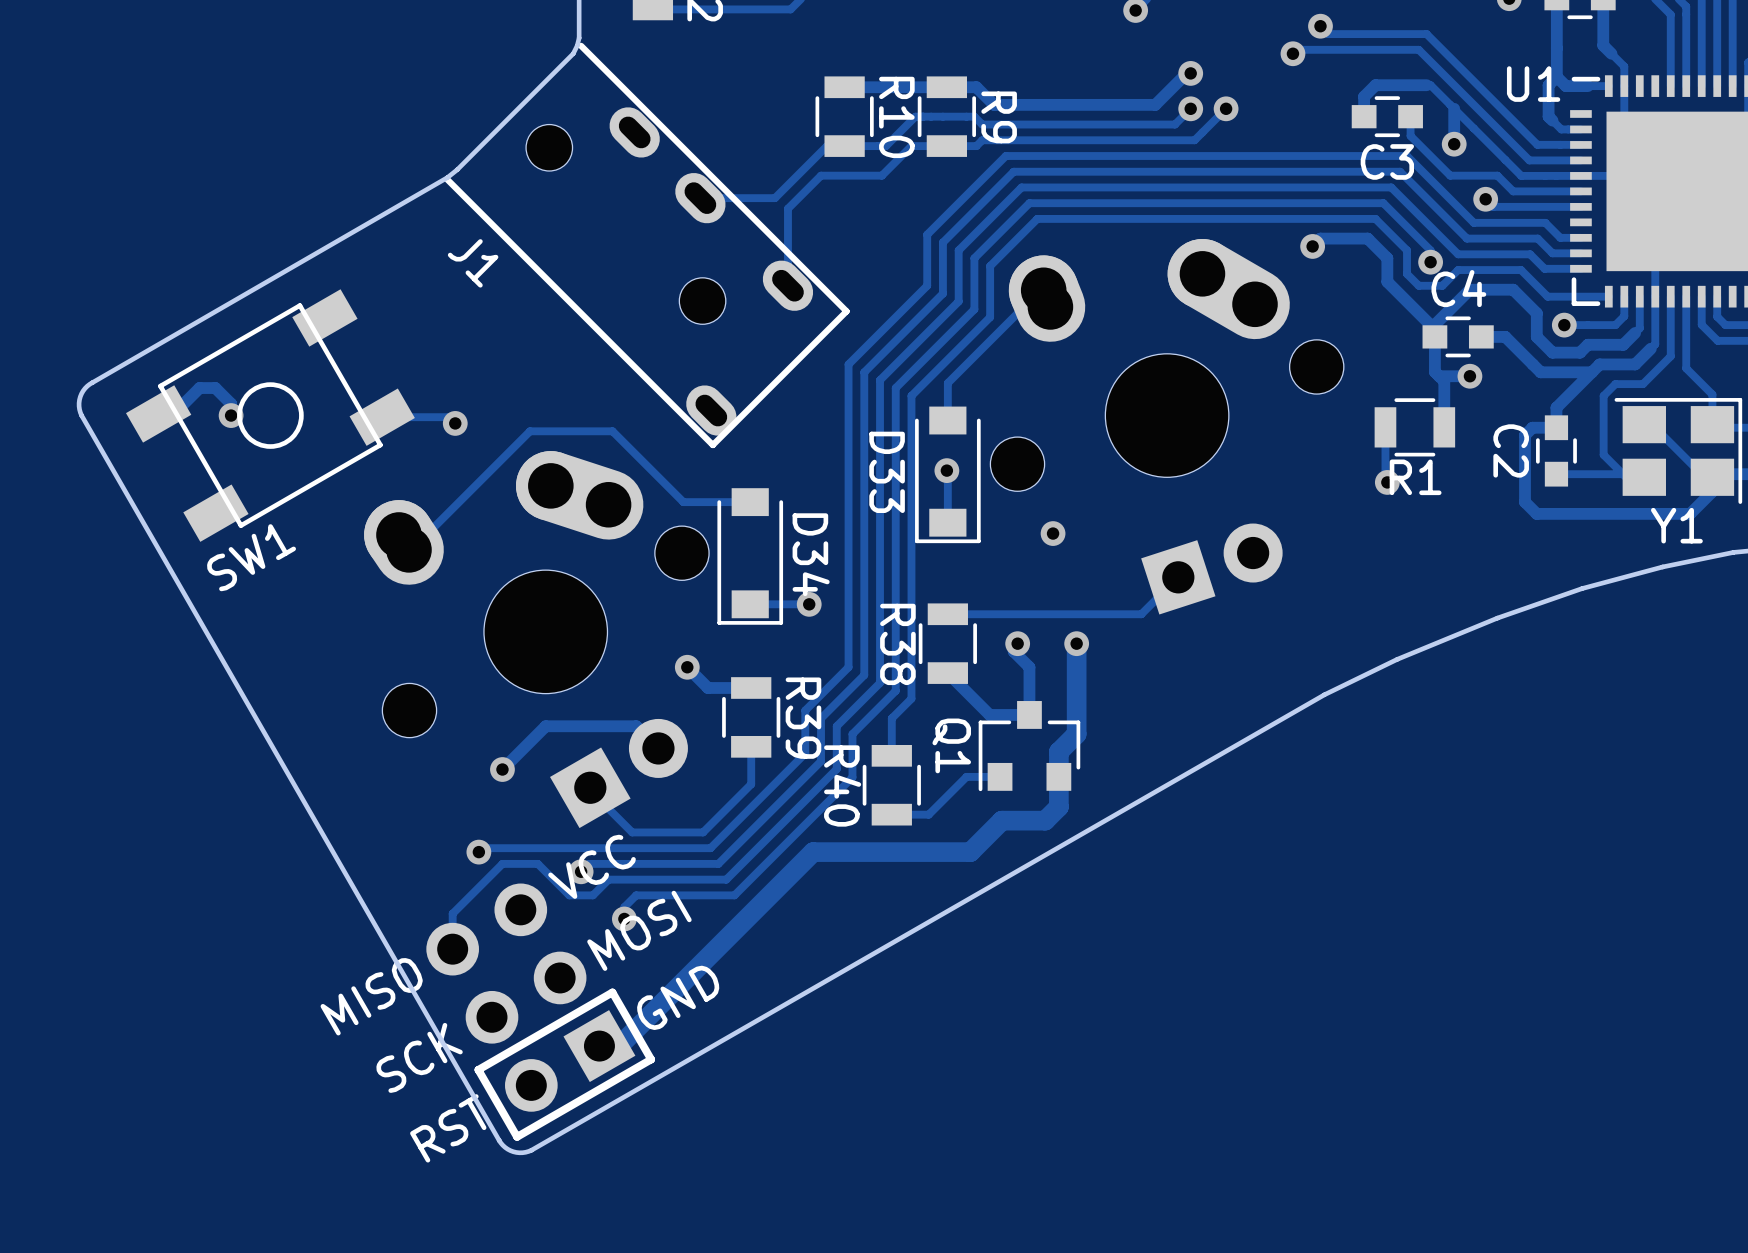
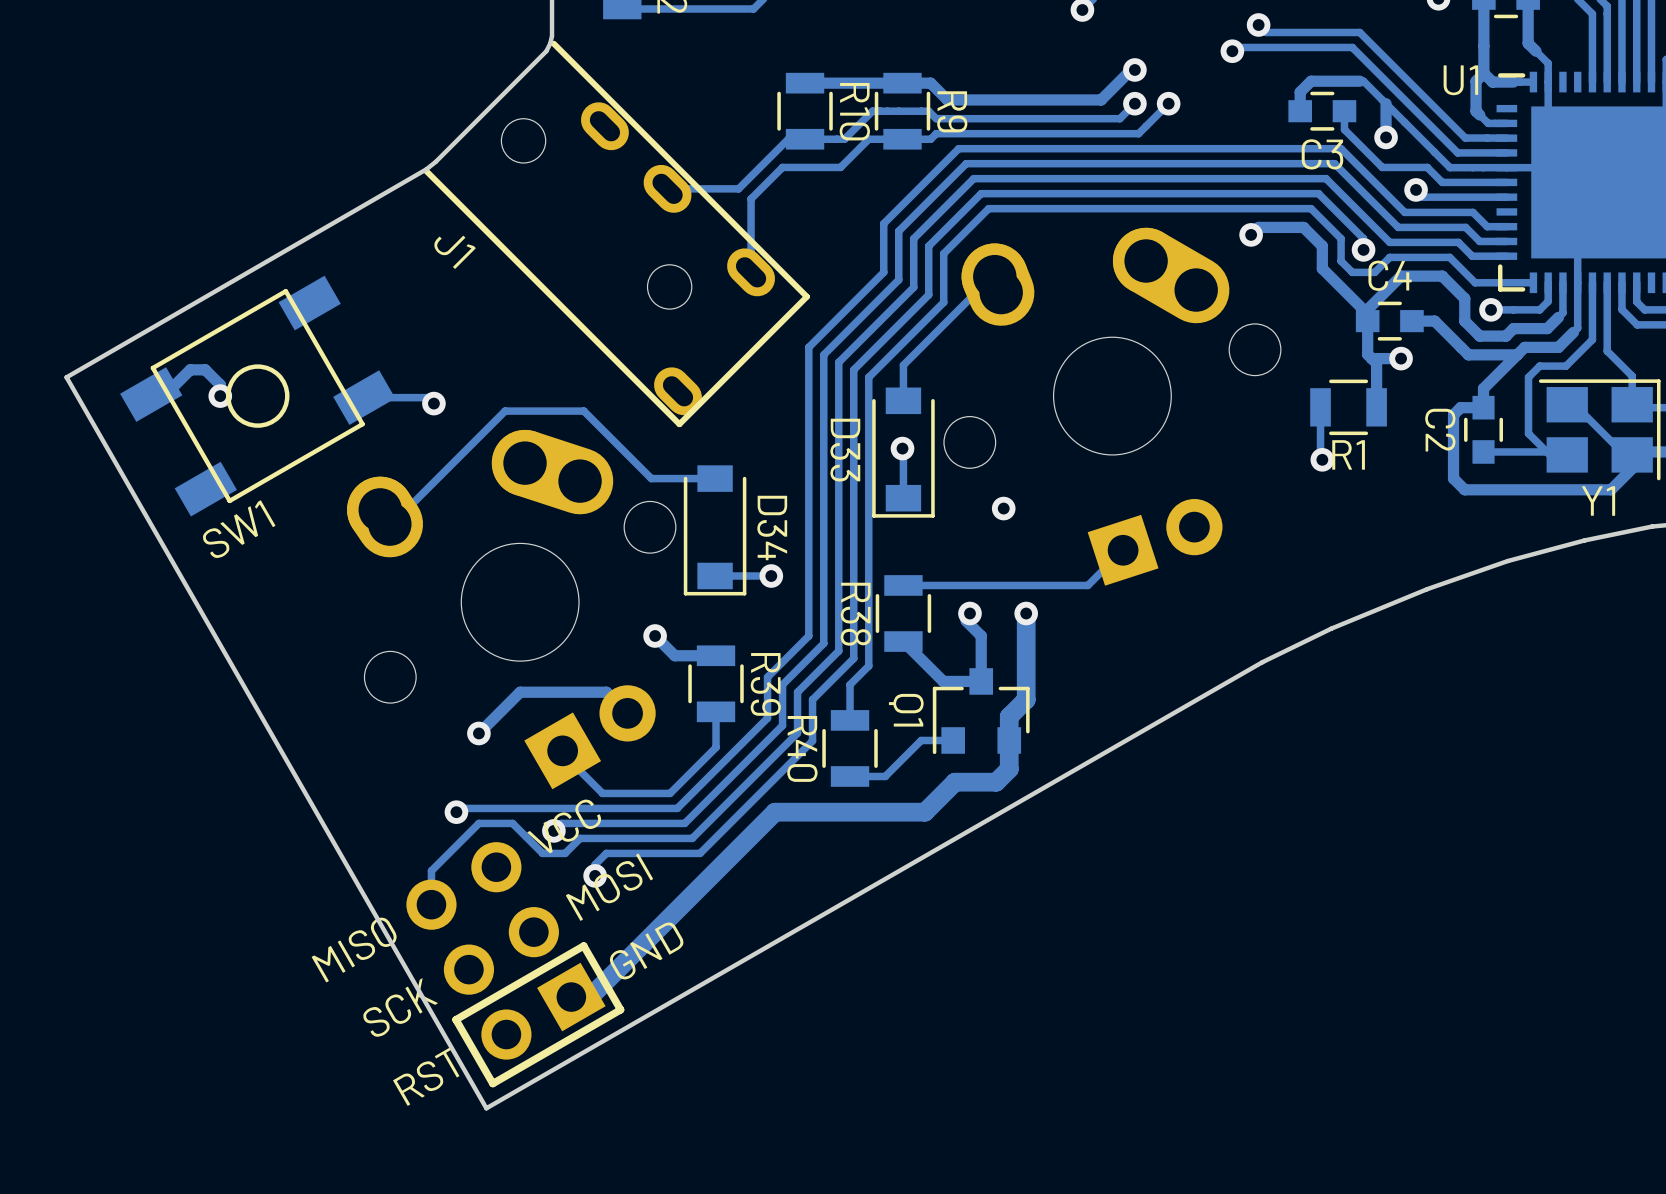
board edge: (447, 177) (89, 384) (81, 393) (79, 406) (81, 415) (499, 1140) -> (426, 169) (66, 377) (486, 1108) (1262, 662)
board edge: (1324, 694) (531, 1150) (522, 1152) (513, 1151) (505, 1147) (499, 1140) -> none

